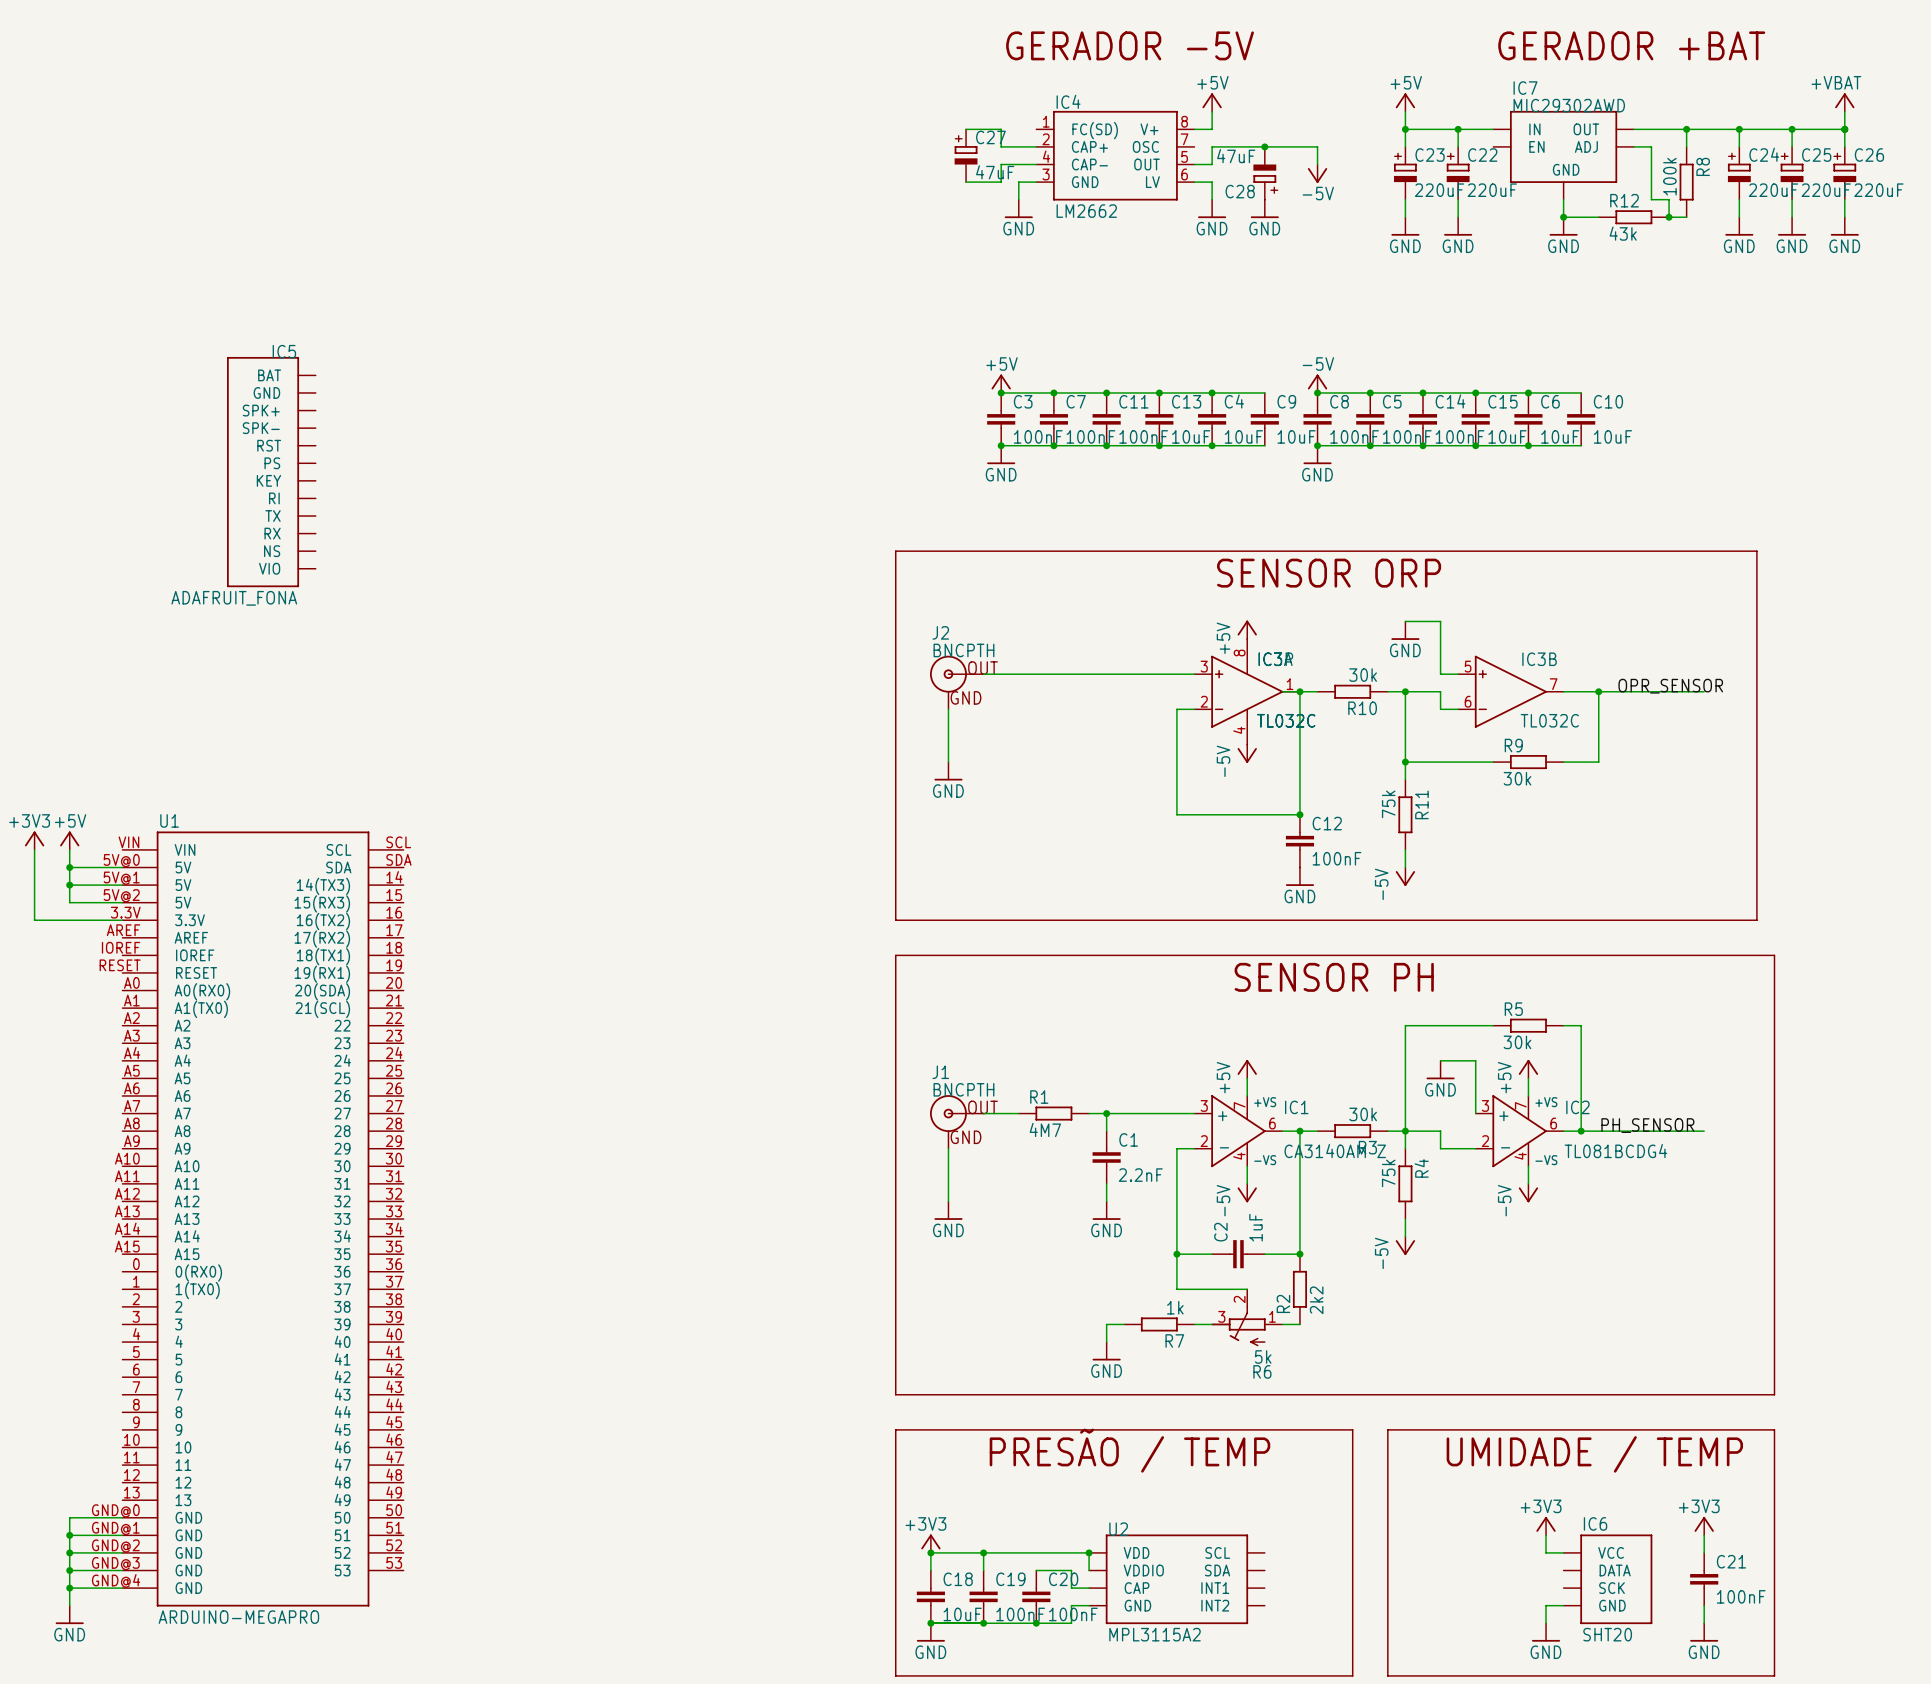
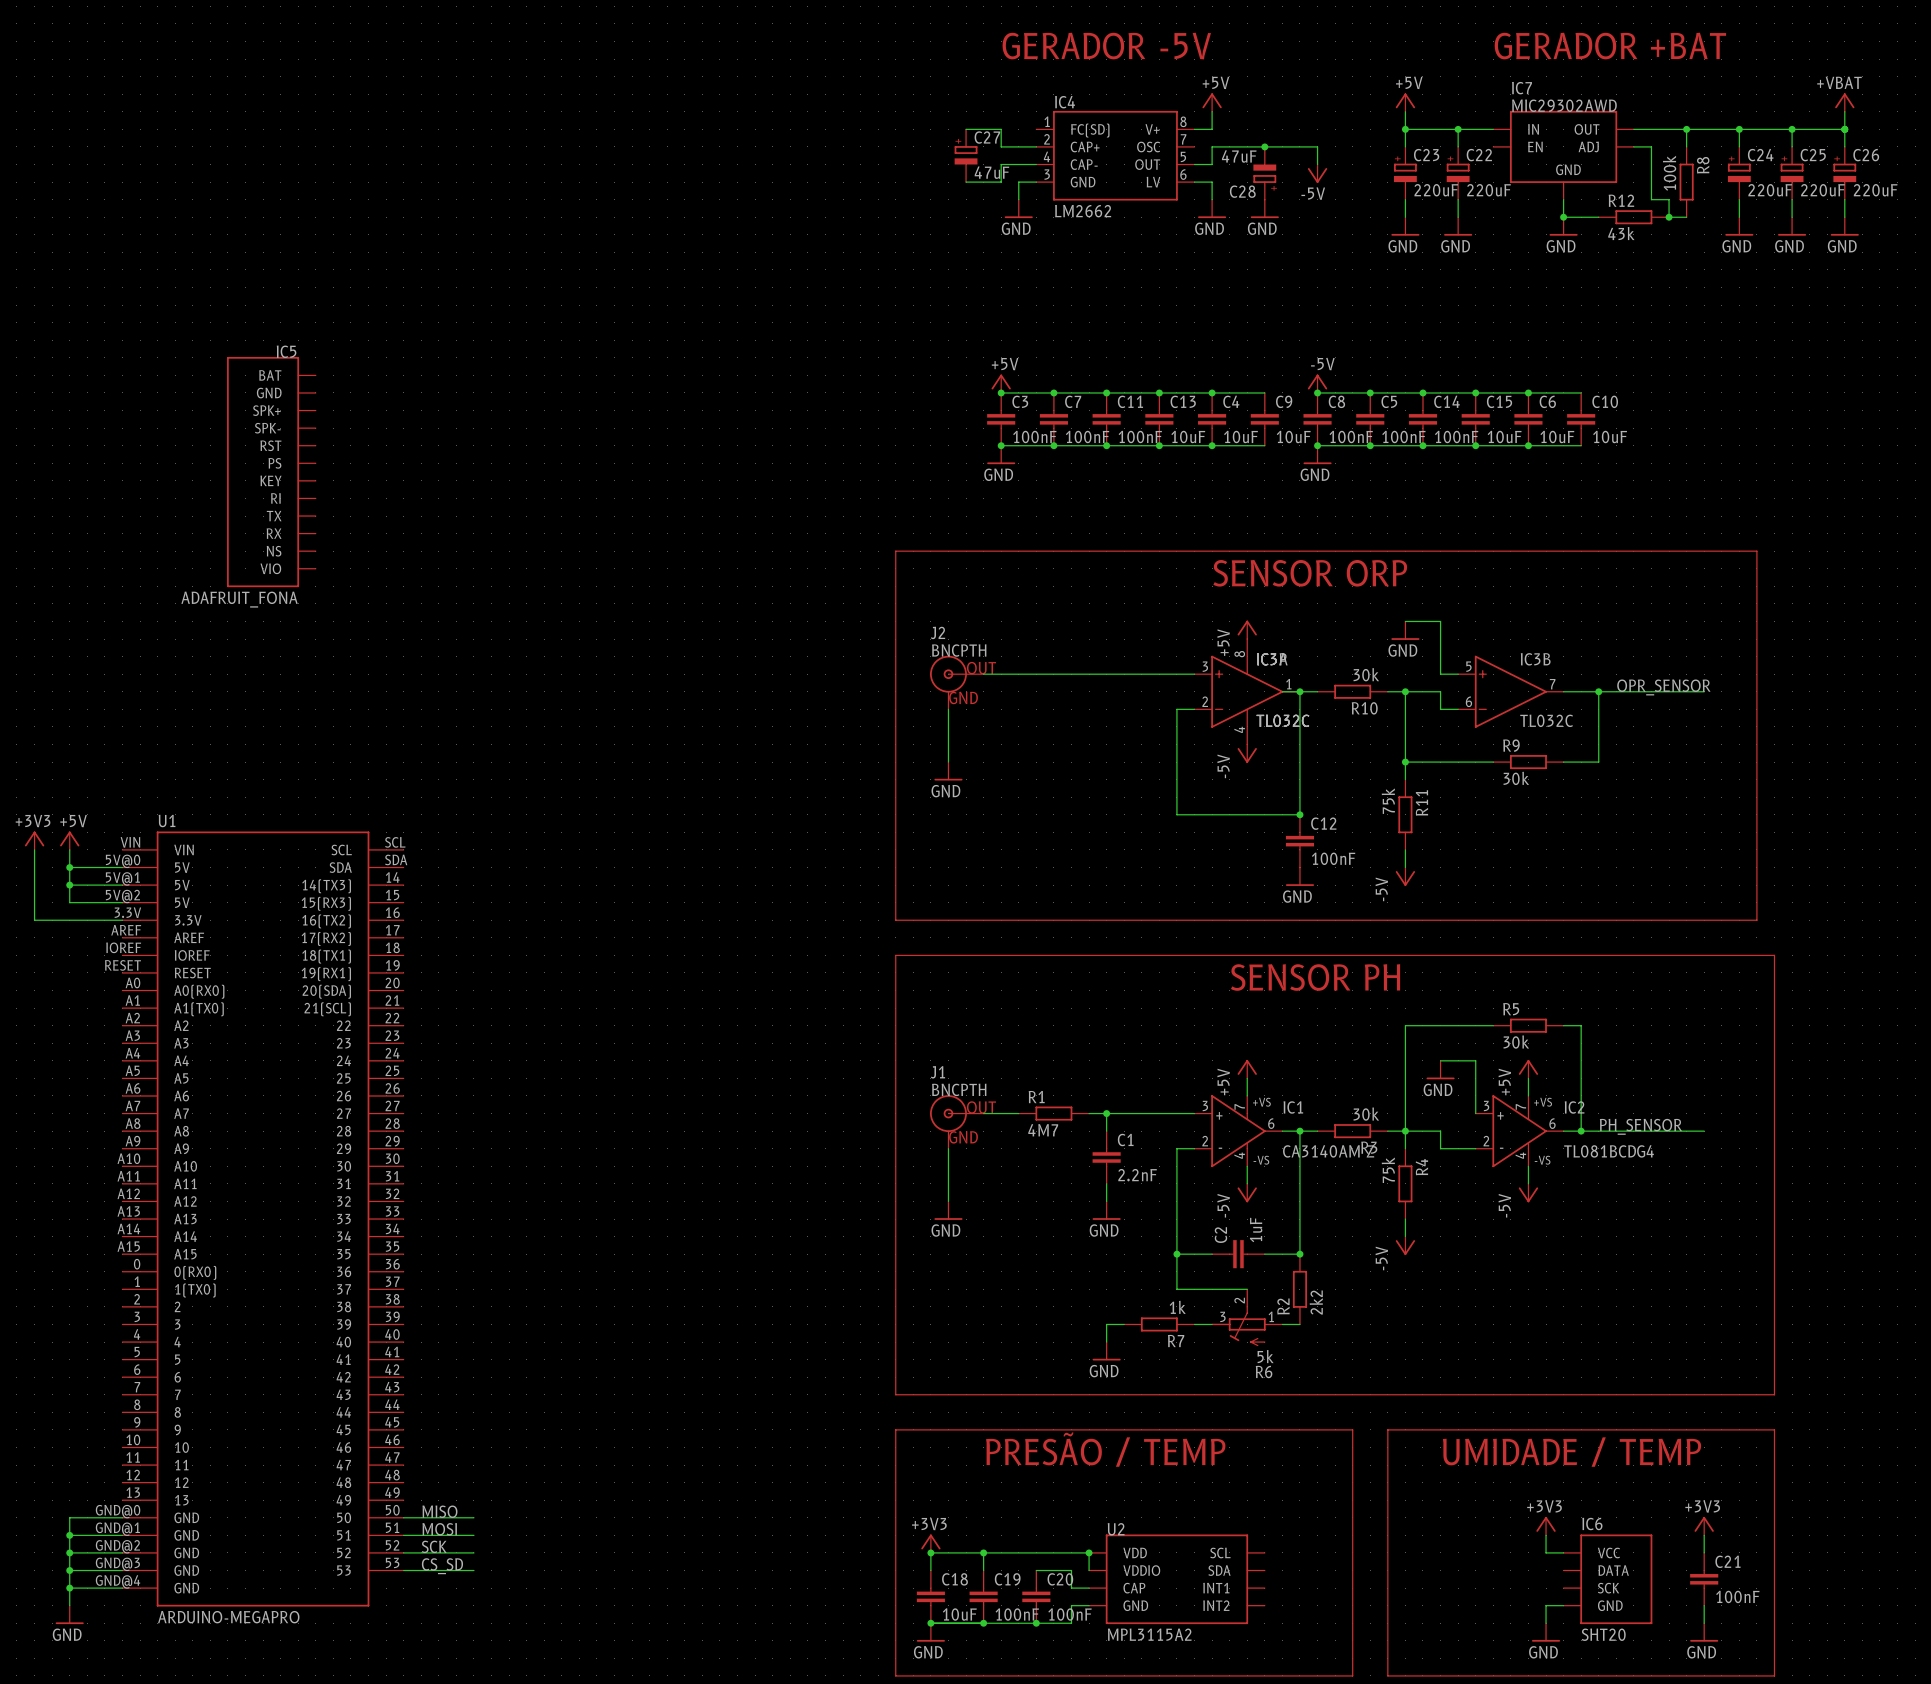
label: none -> MISO (439, 1511)
wire: none -> (403, 1517) (473, 1517)
label: none -> MOSI (439, 1529)
wire: none -> (403, 1535) (473, 1535)
label: none -> SCK (434, 1546)
wire: none -> (403, 1552) (473, 1552)
label: none -> CS_SD (442, 1566)
wire: none -> (403, 1570) (473, 1570)

